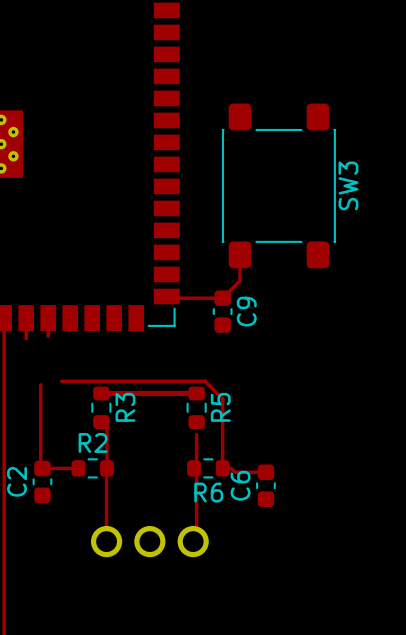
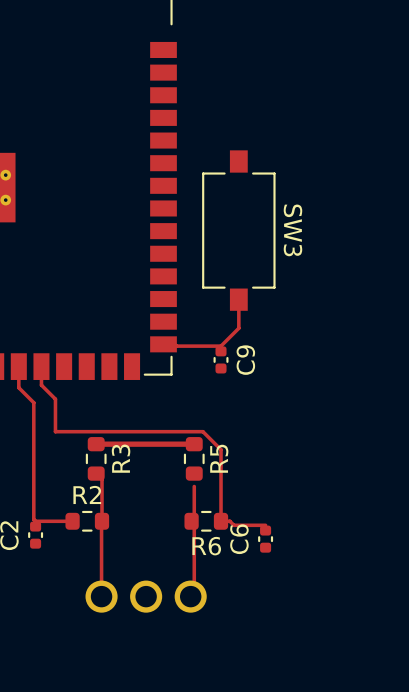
SW3 footprint: [221, 103, 336, 269] -> [202, 150, 276, 311]
C9 footprint: [212, 290, 233, 333] -> [213, 346, 229, 374]
track: none -> (41, 385) (55, 399) (55, 431)
track: none -> (18, 387) (33, 402) (33, 435)
C2 footprint: [32, 460, 53, 504] -> [28, 521, 44, 549]
C6 footprint: [256, 464, 276, 507] -> [258, 525, 274, 553]

